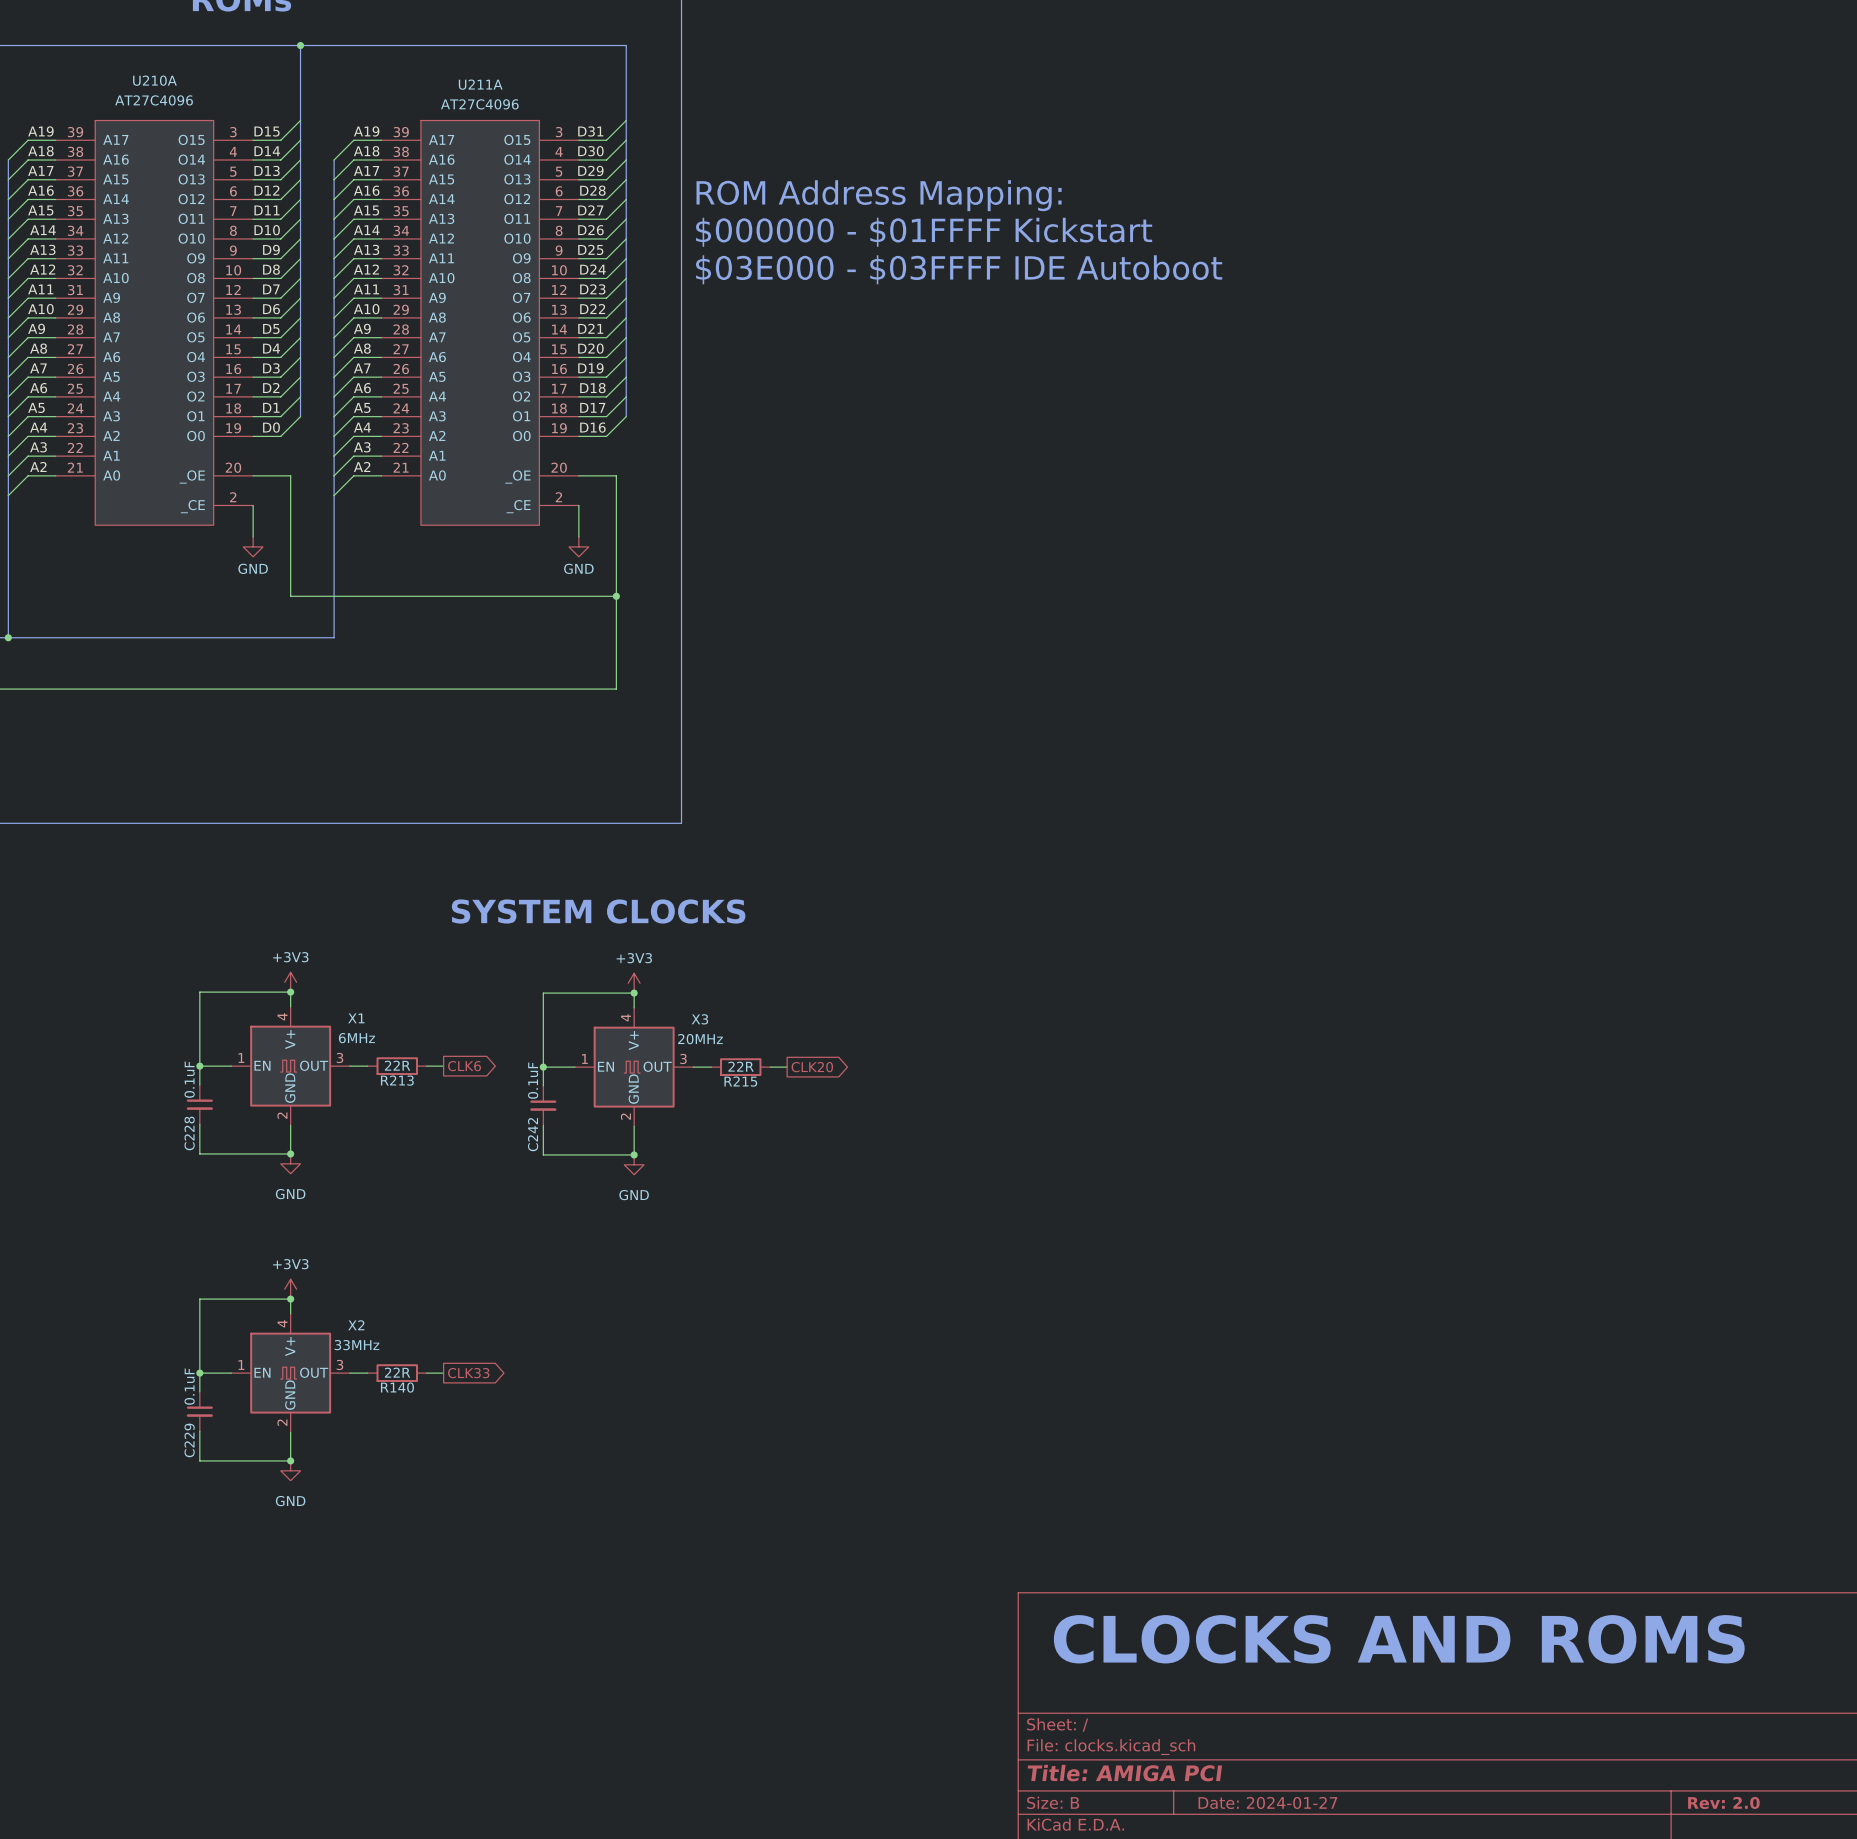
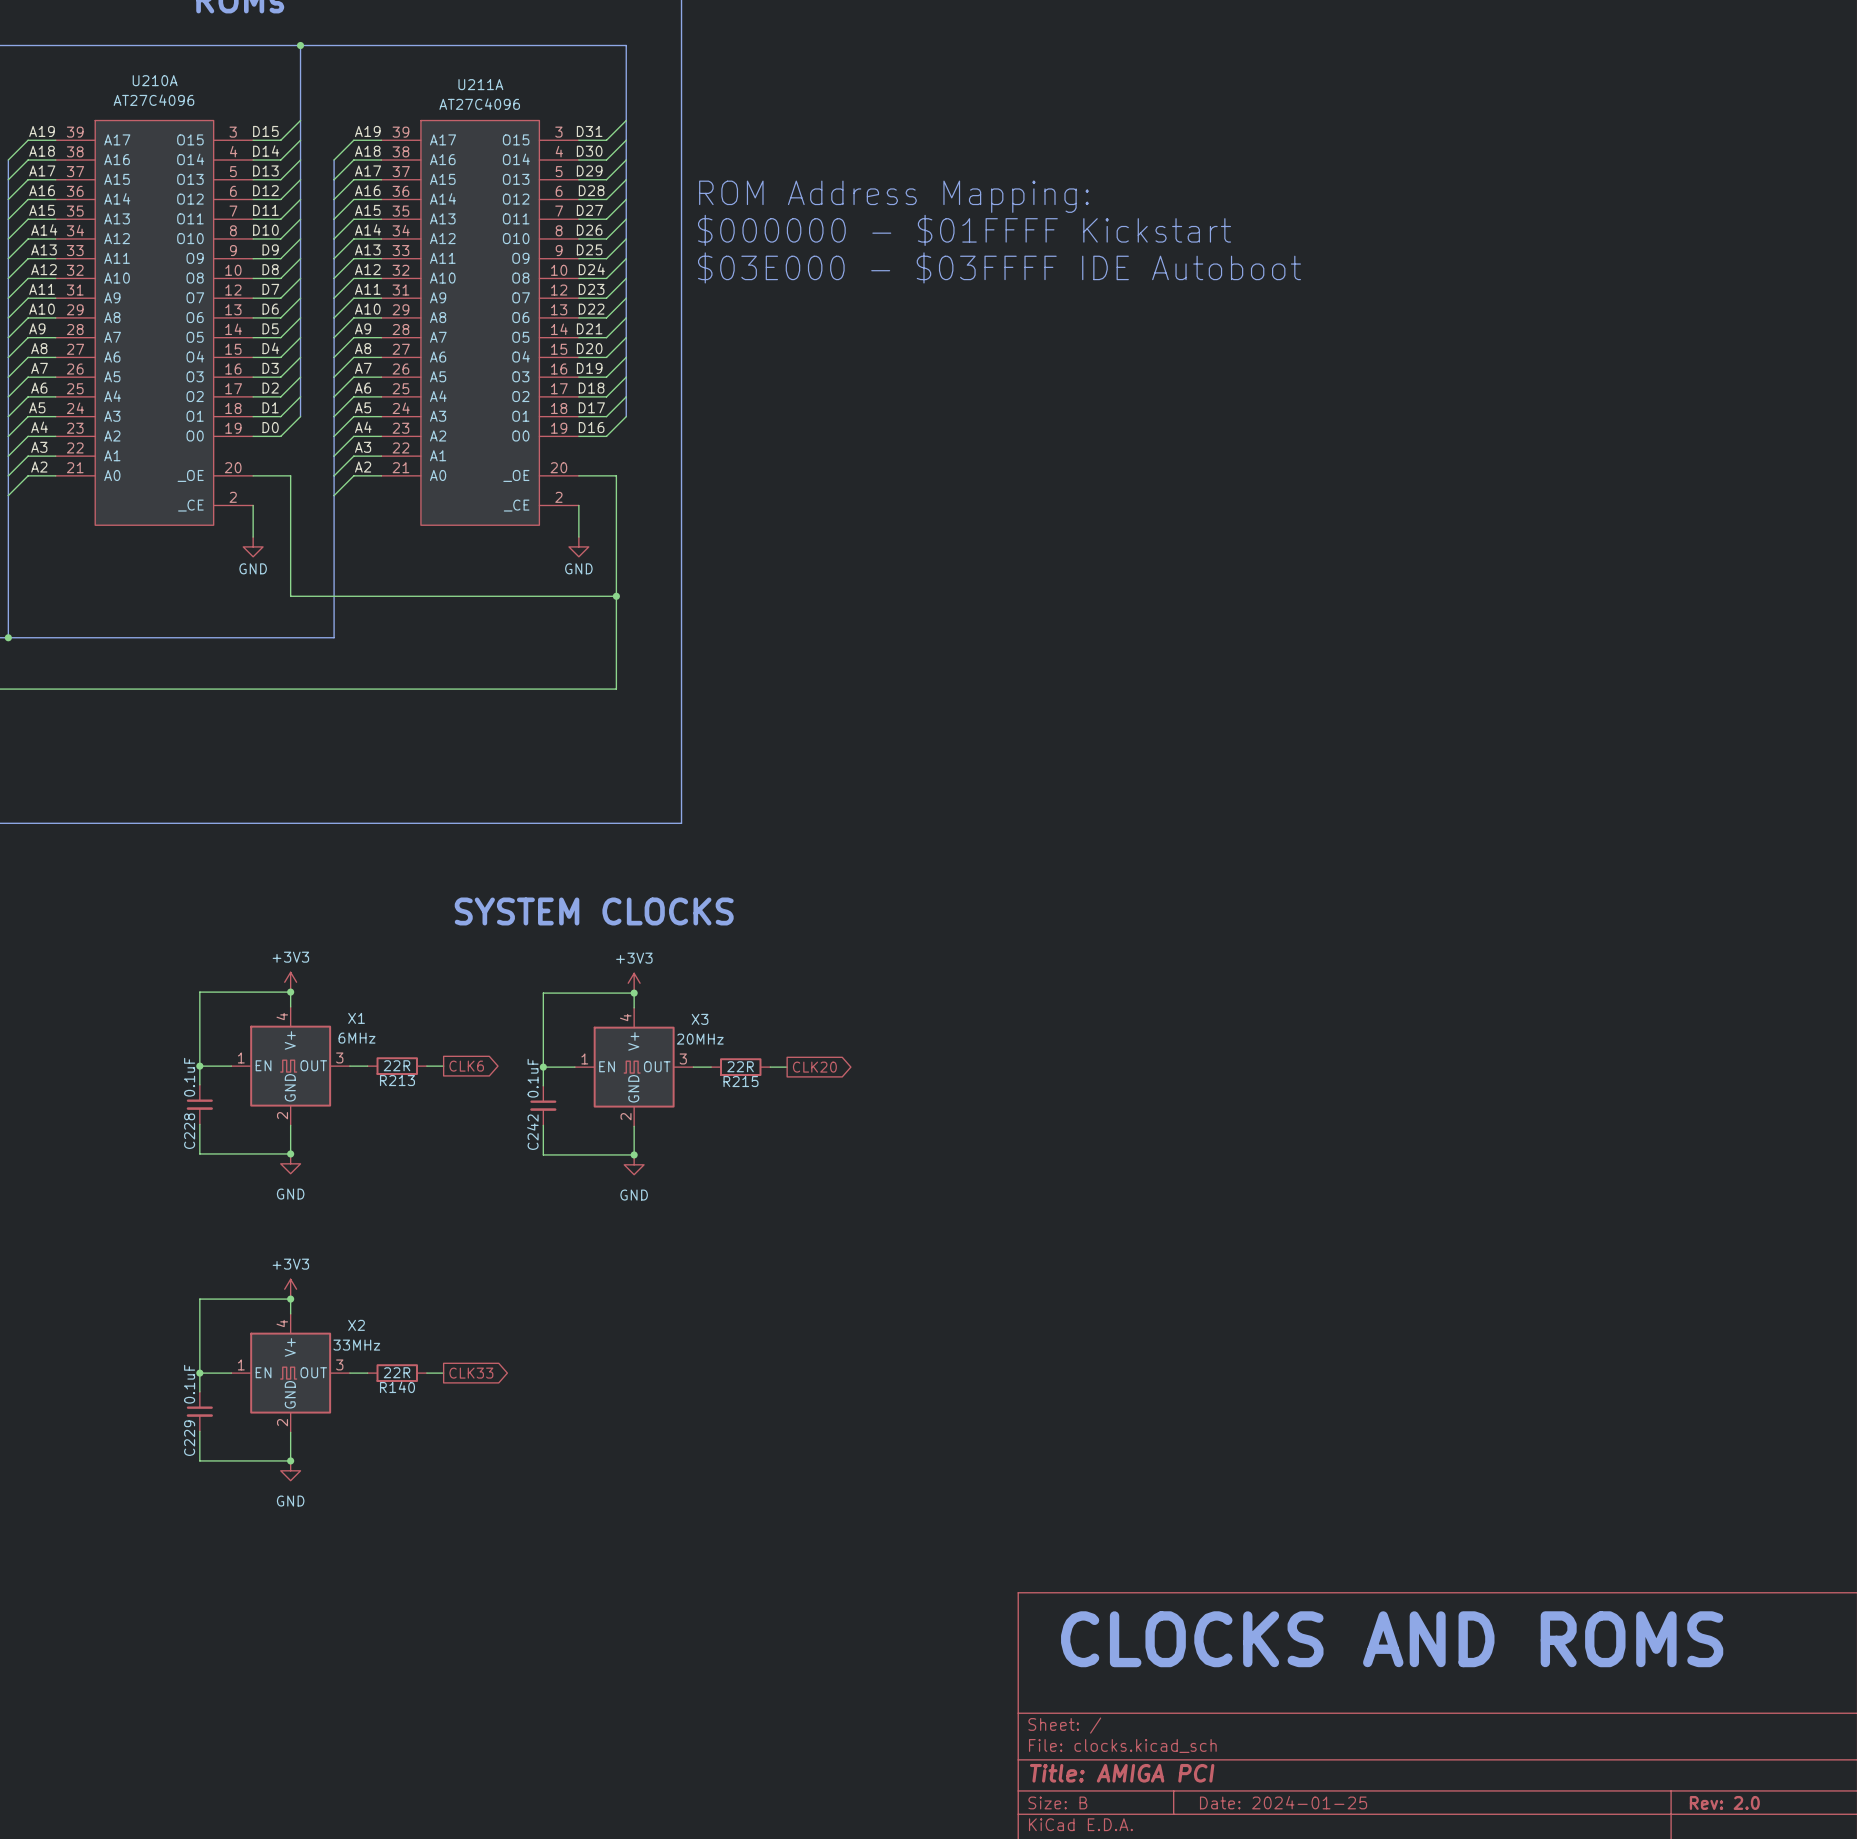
title block: Date: 2024-01-27 (1267, 1802) -> Date: 2024-01-25 (1283, 1802)

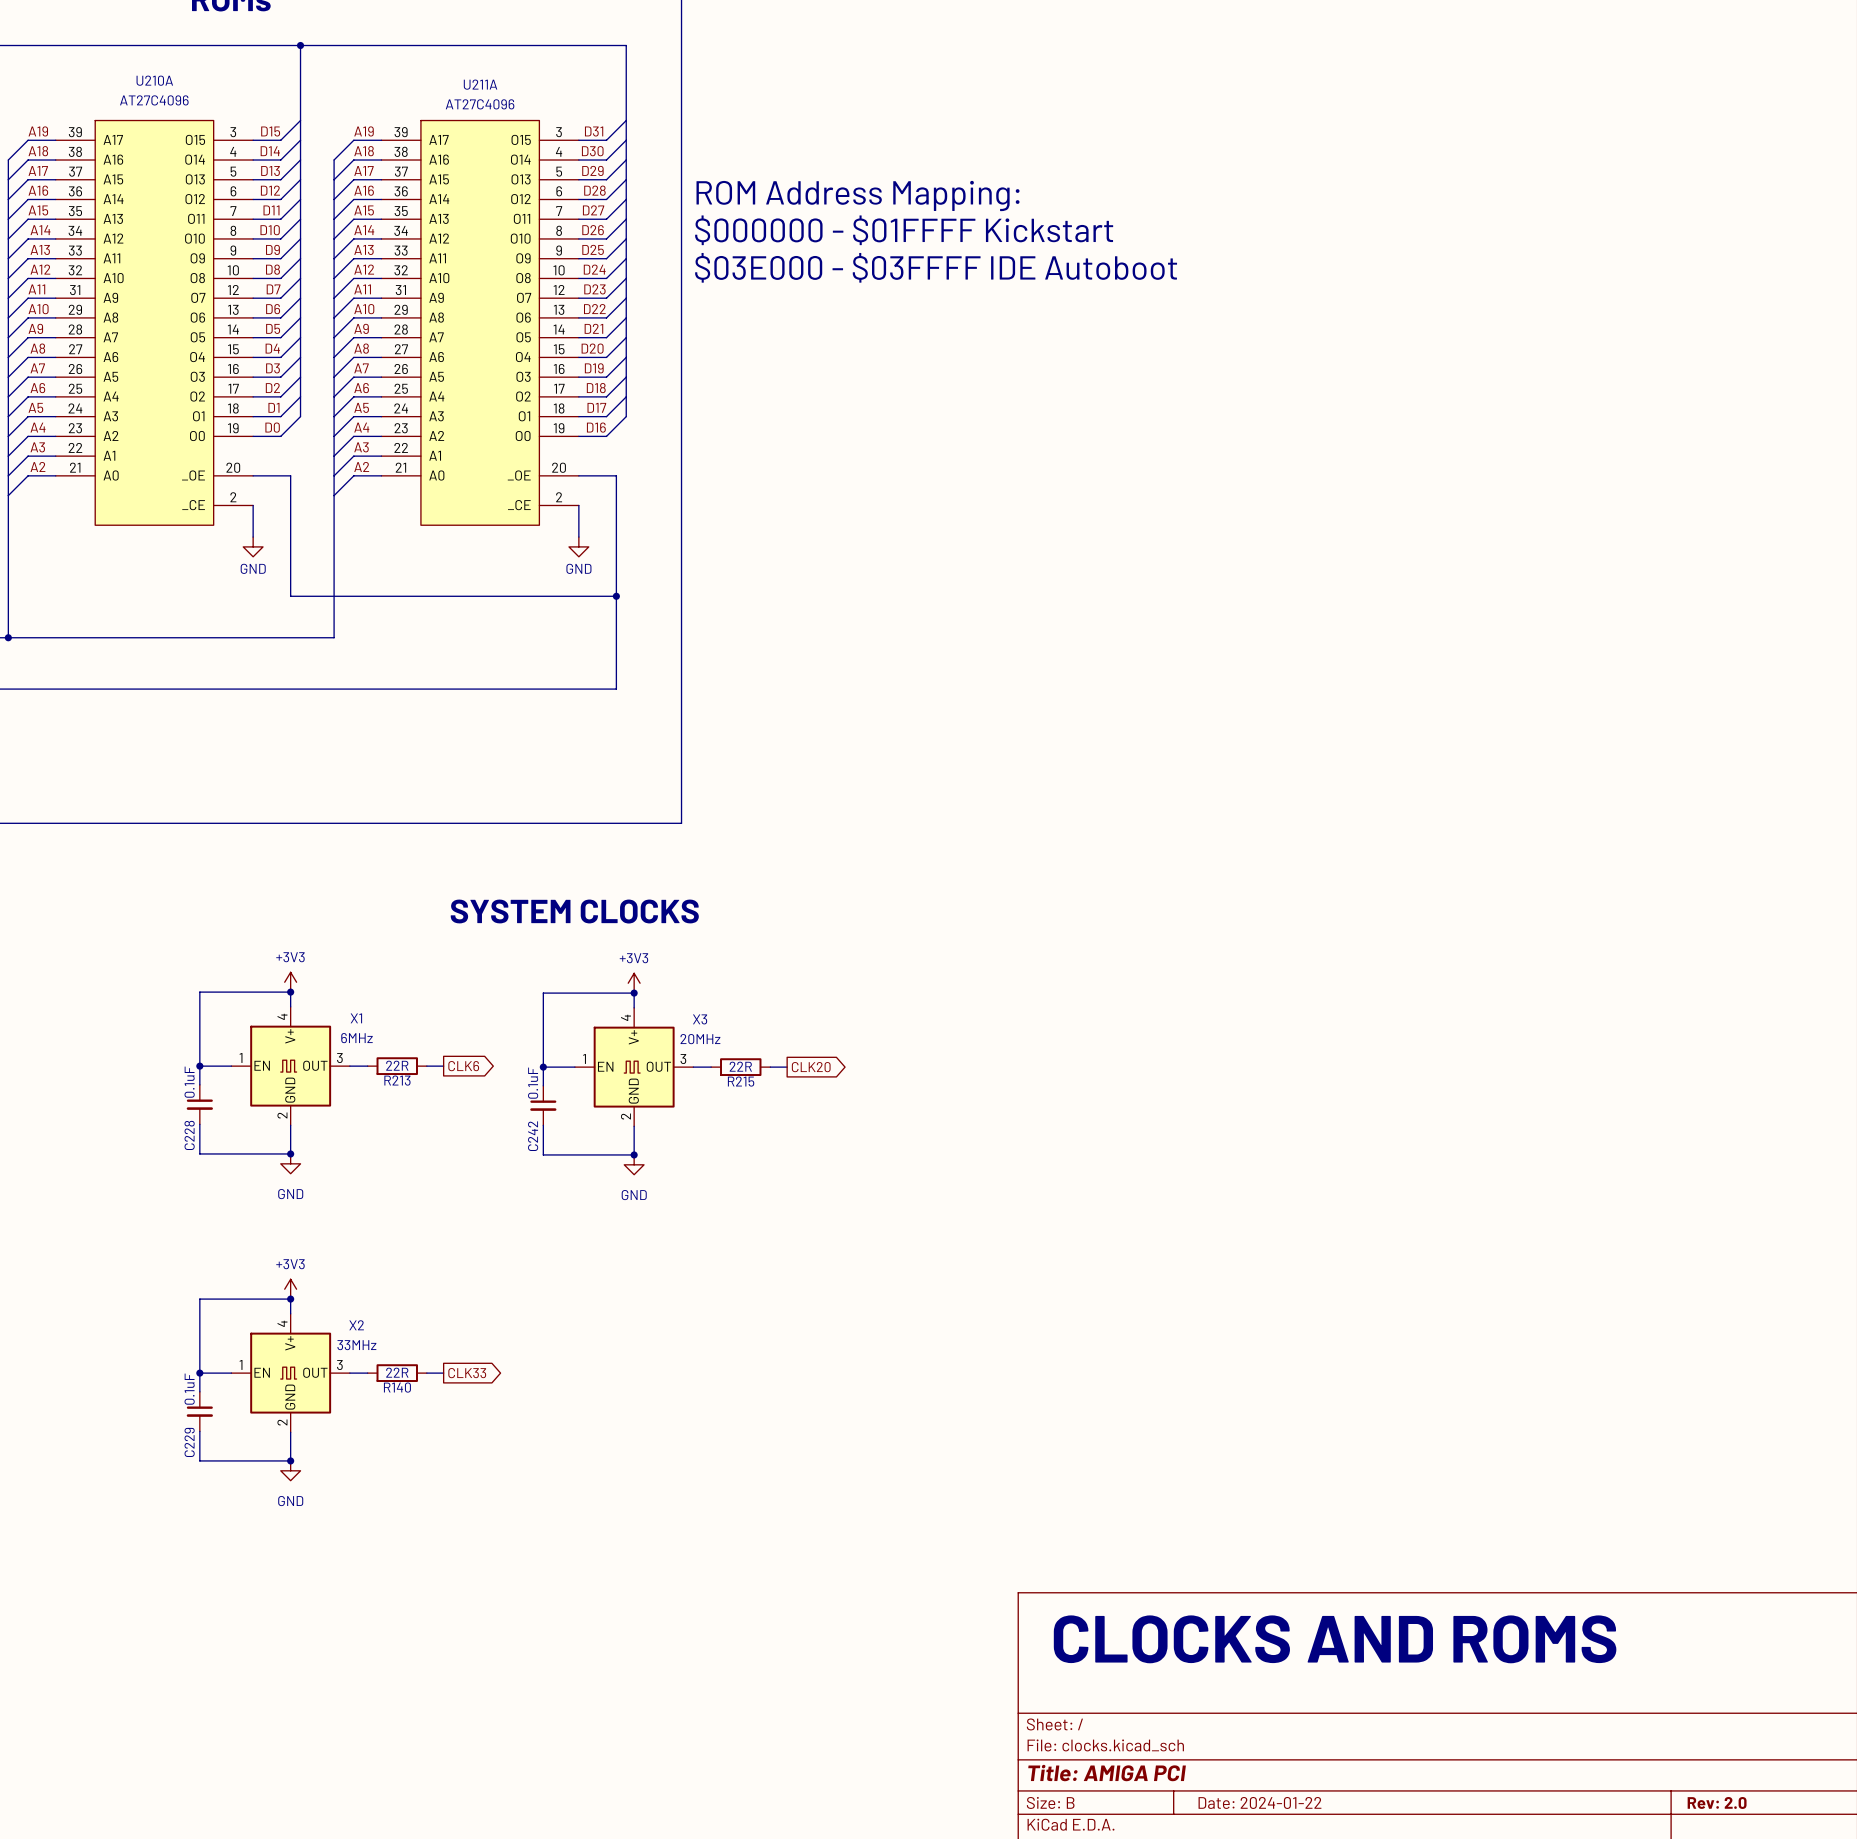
title block: Date: 2024-01-25 (1283, 1802) -> Date: 2024-01-22 (1259, 1802)

